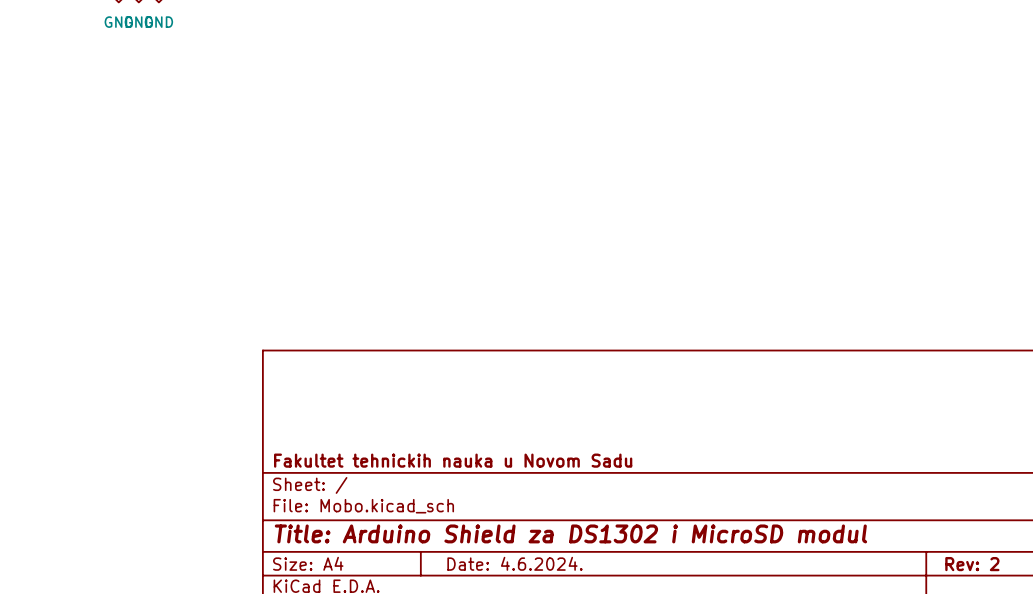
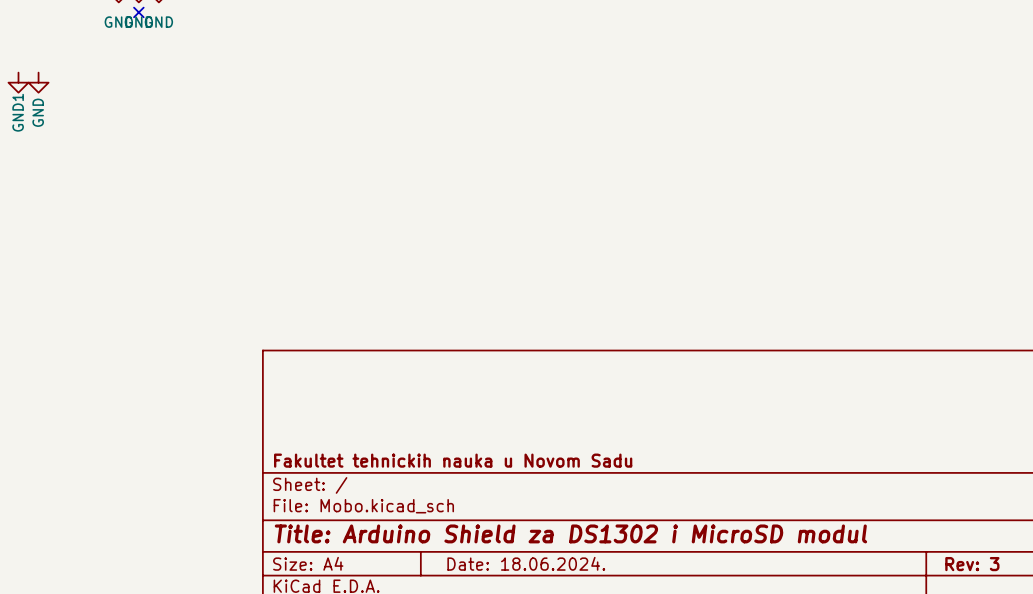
no-connect mark: none -> (138, 12)
power symbol: none -> GND1 (18, 82)
power symbol: none -> GND (38, 82)
title block: Date: 4.6.2024. (514, 563) -> Date: 18.06.2024. (526, 563)
title block: Rev: 2 (972, 564) -> Rev: 3 (972, 564)

